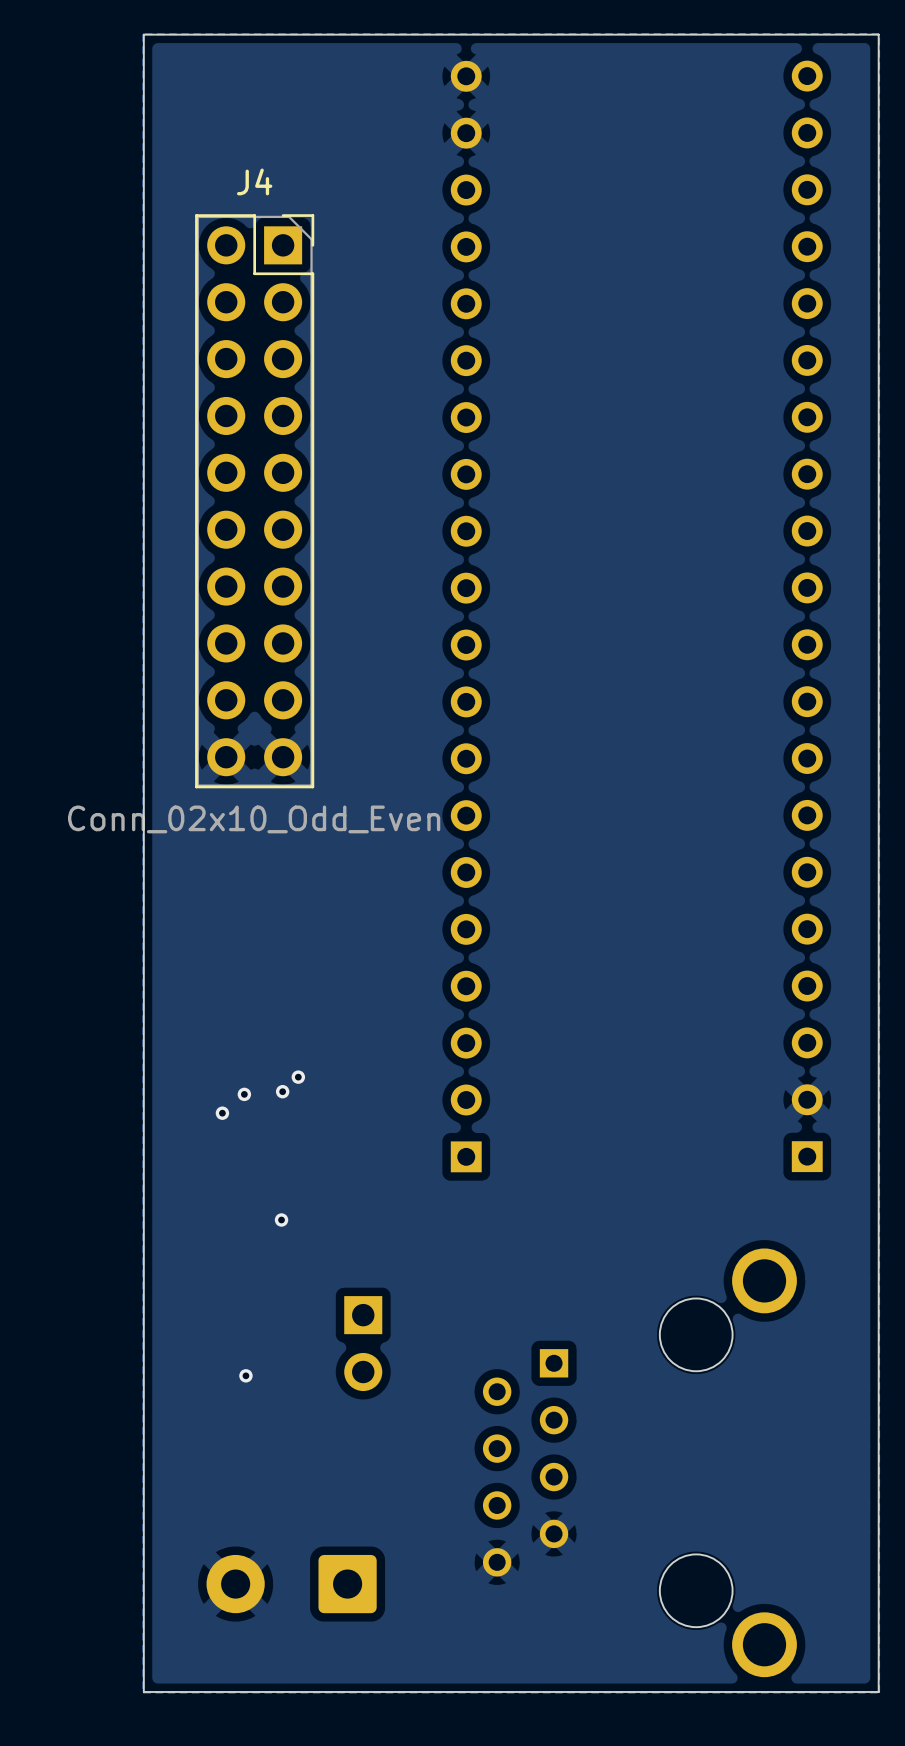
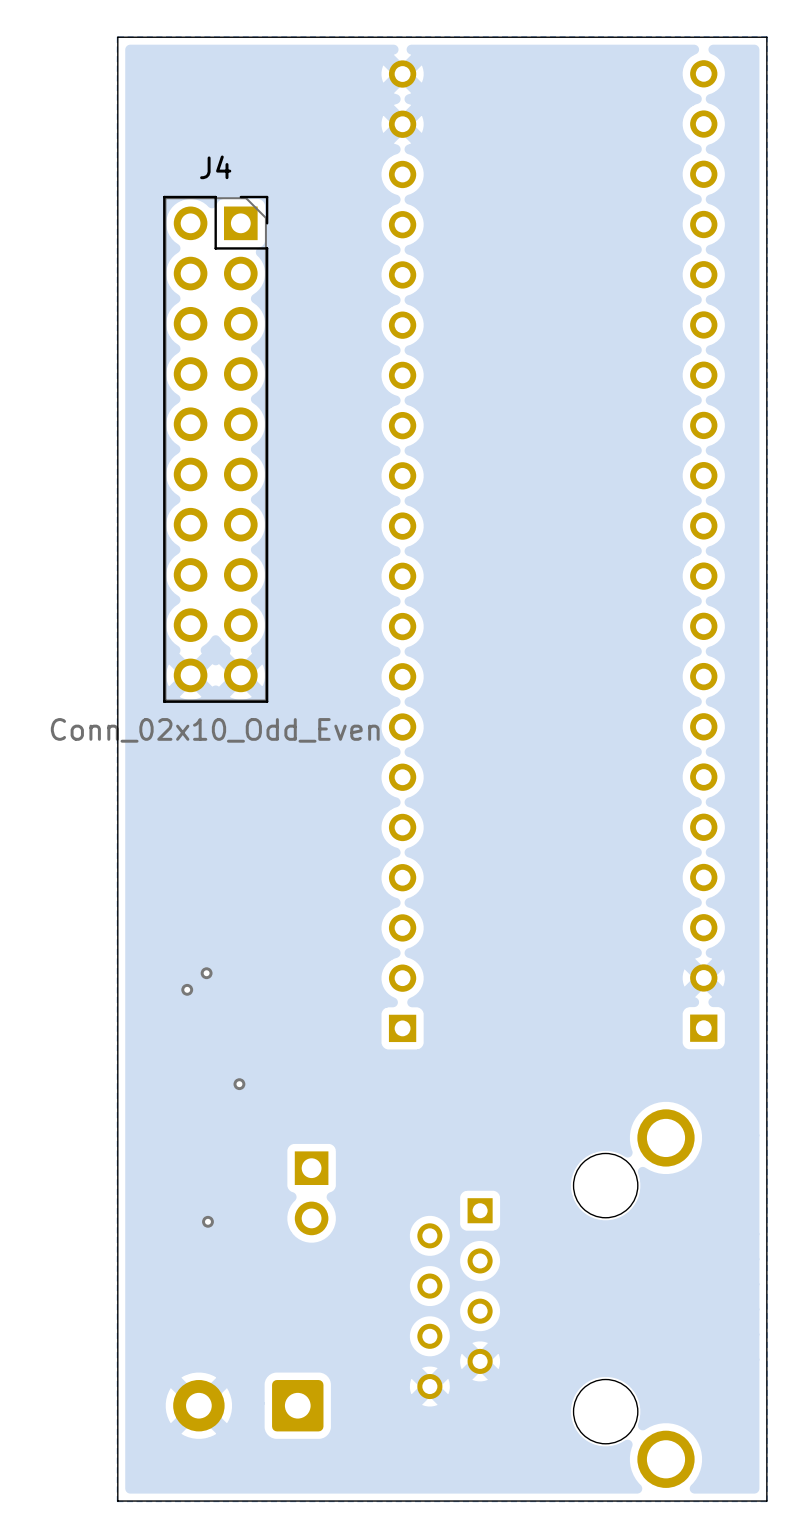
via: (298, 1077) -> none
via: (282, 1091) -> none

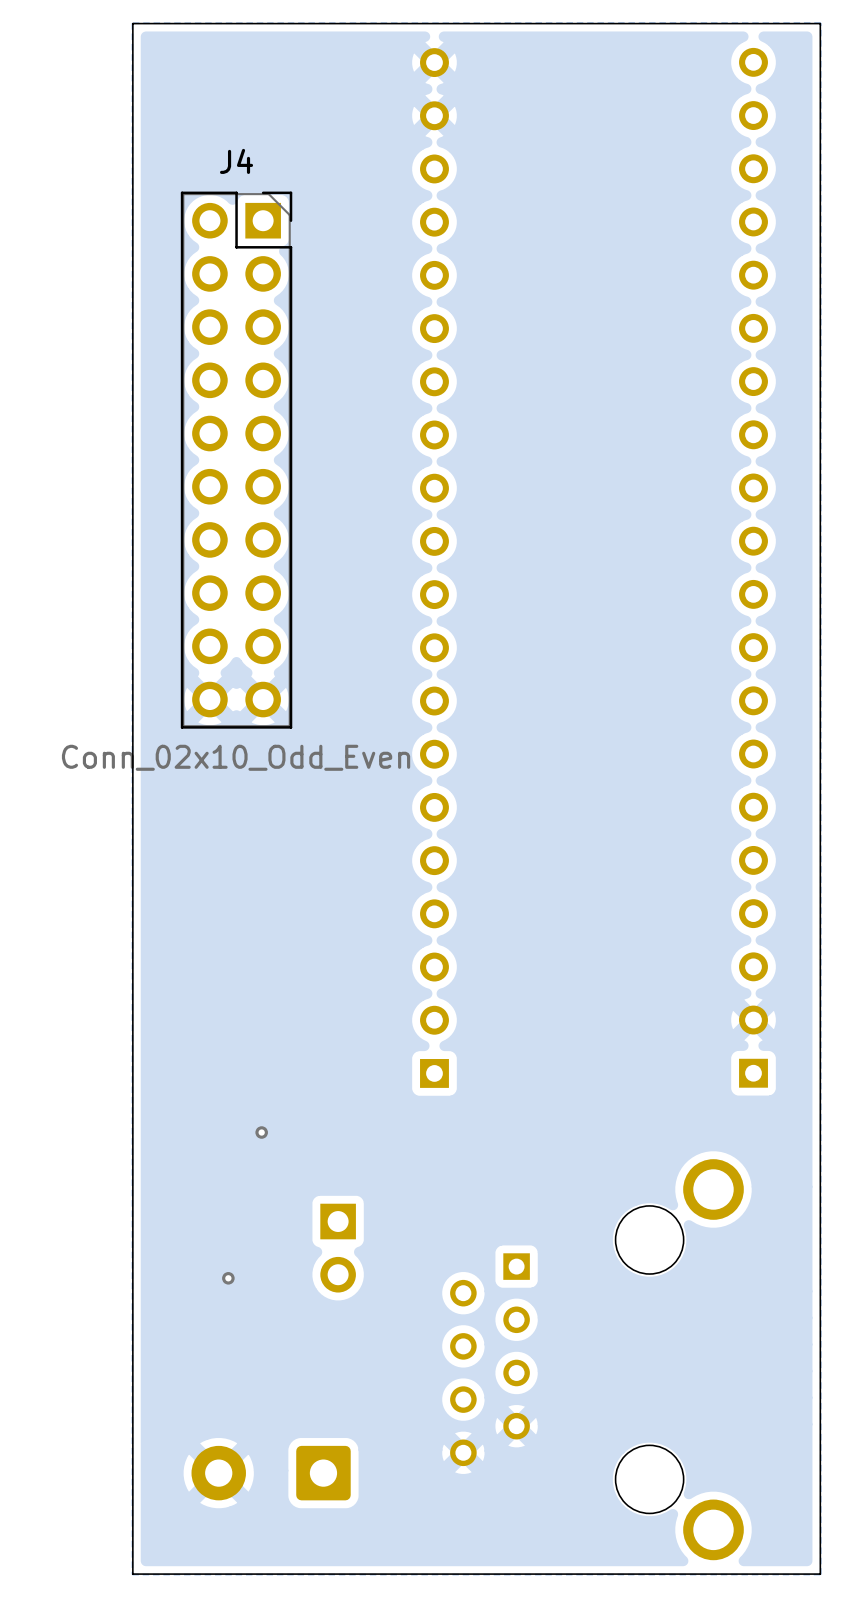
via: (206, 973) -> none
via: (187, 989) -> none

